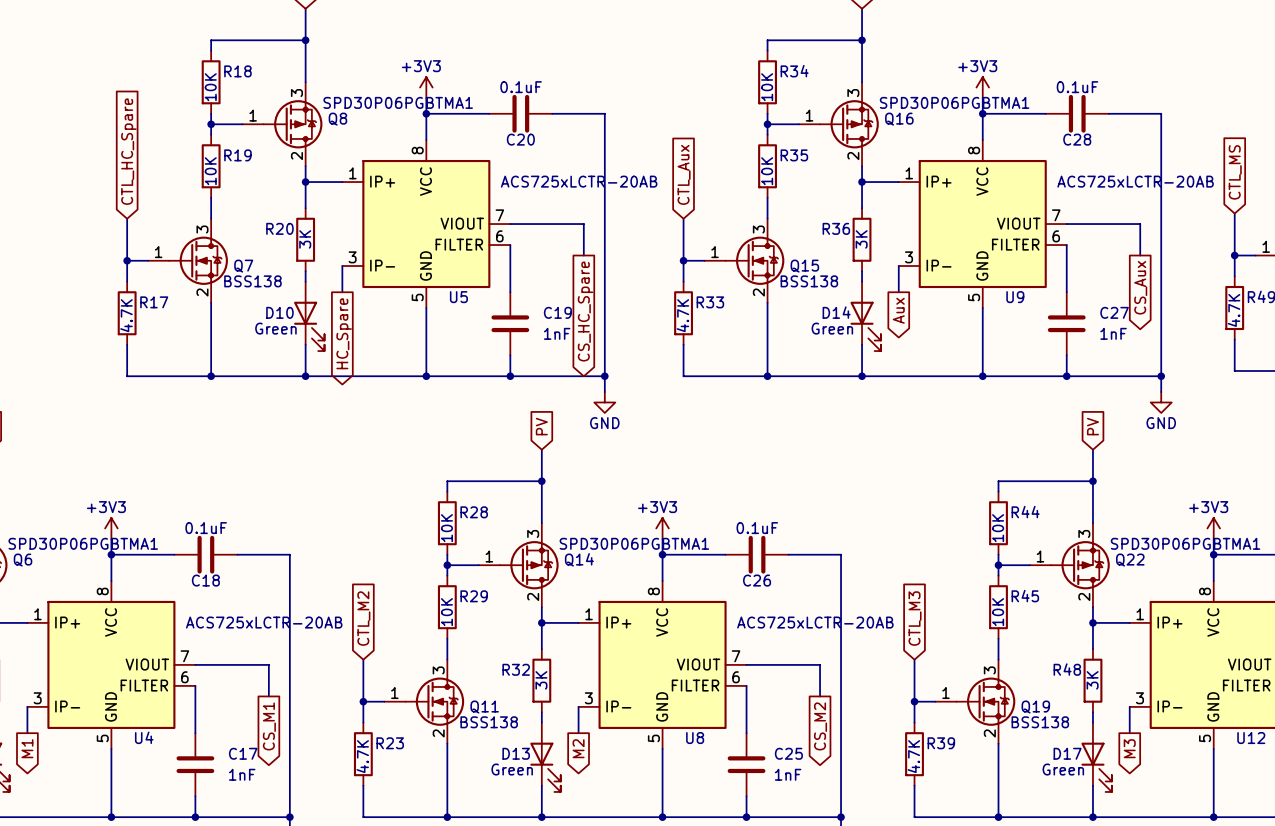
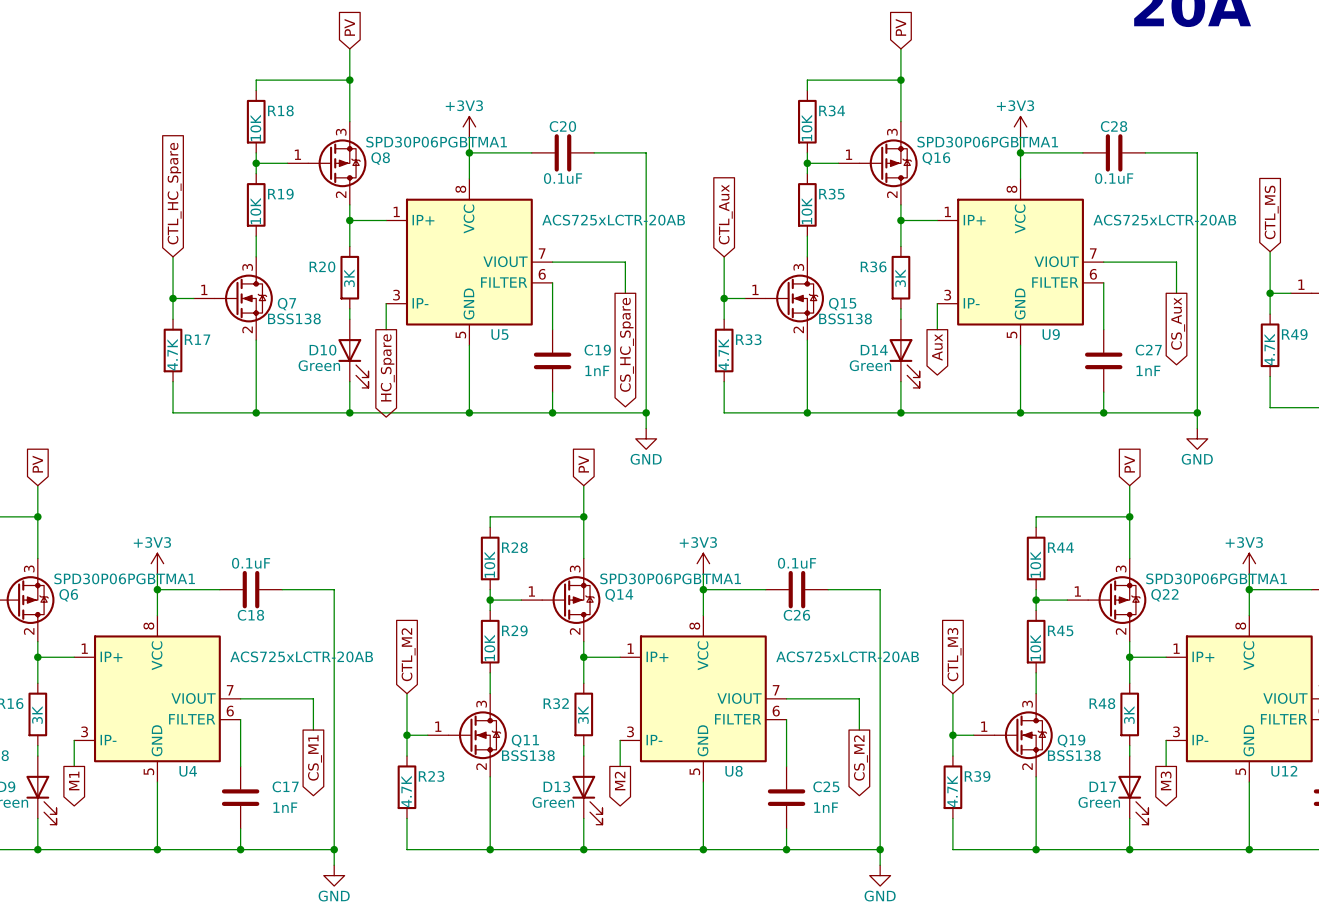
C20 value position: 0.1uF (521, 87) -> 0.1uF (563, 178)
C28 value position: 0.1uF (1077, 87) -> 0.1uF (1114, 178)
C20 name position: C20 (520, 139) -> C20 (562, 126)
C28 name position: C28 (1077, 139) -> C28 (1114, 126)

